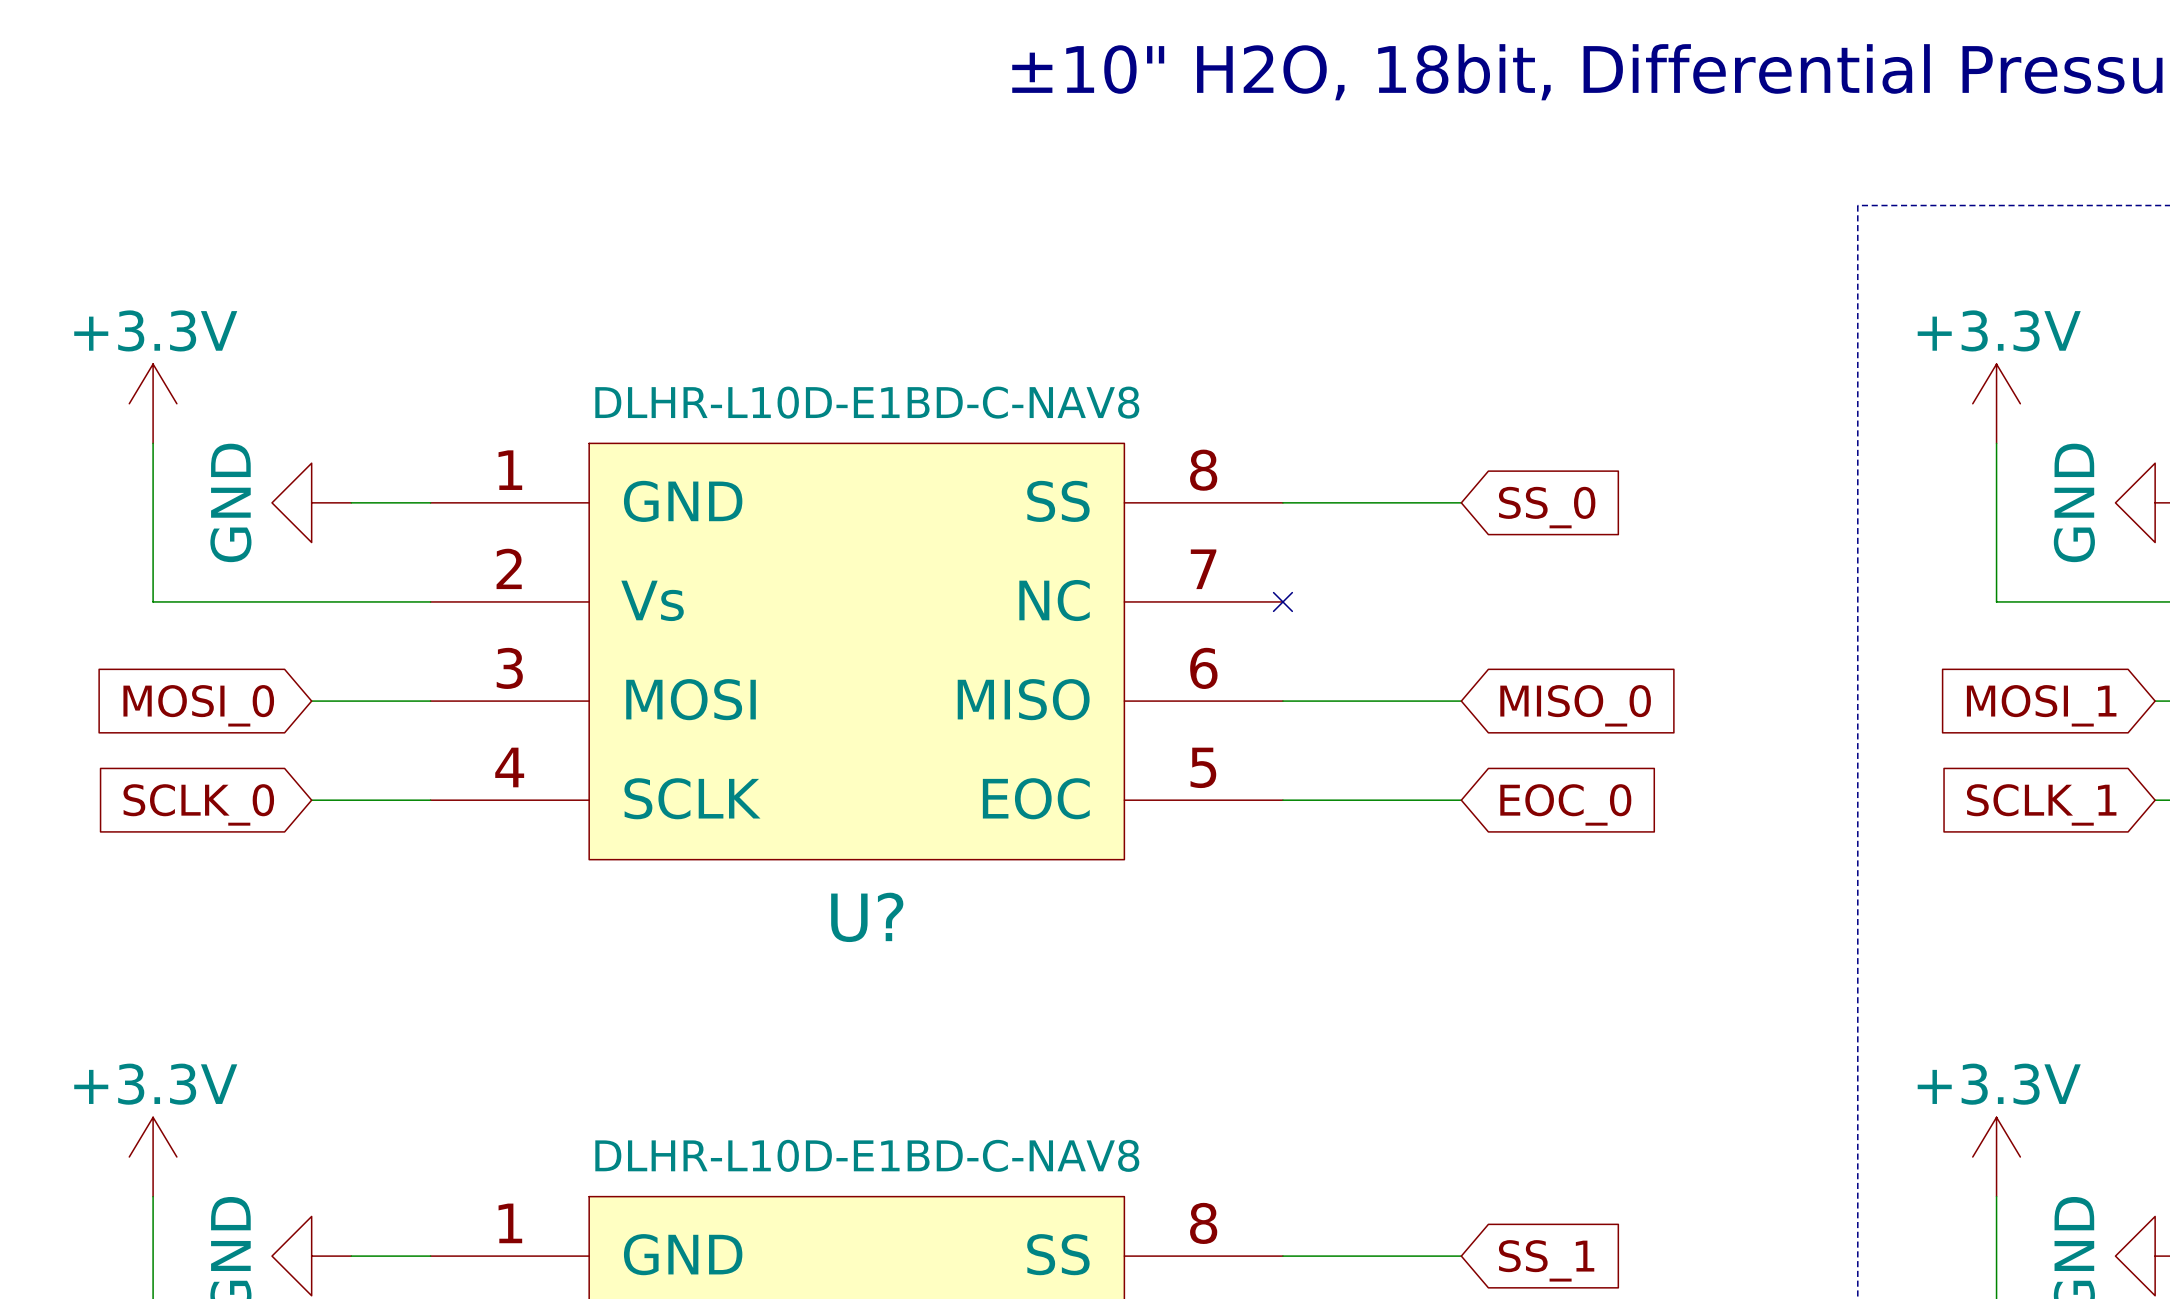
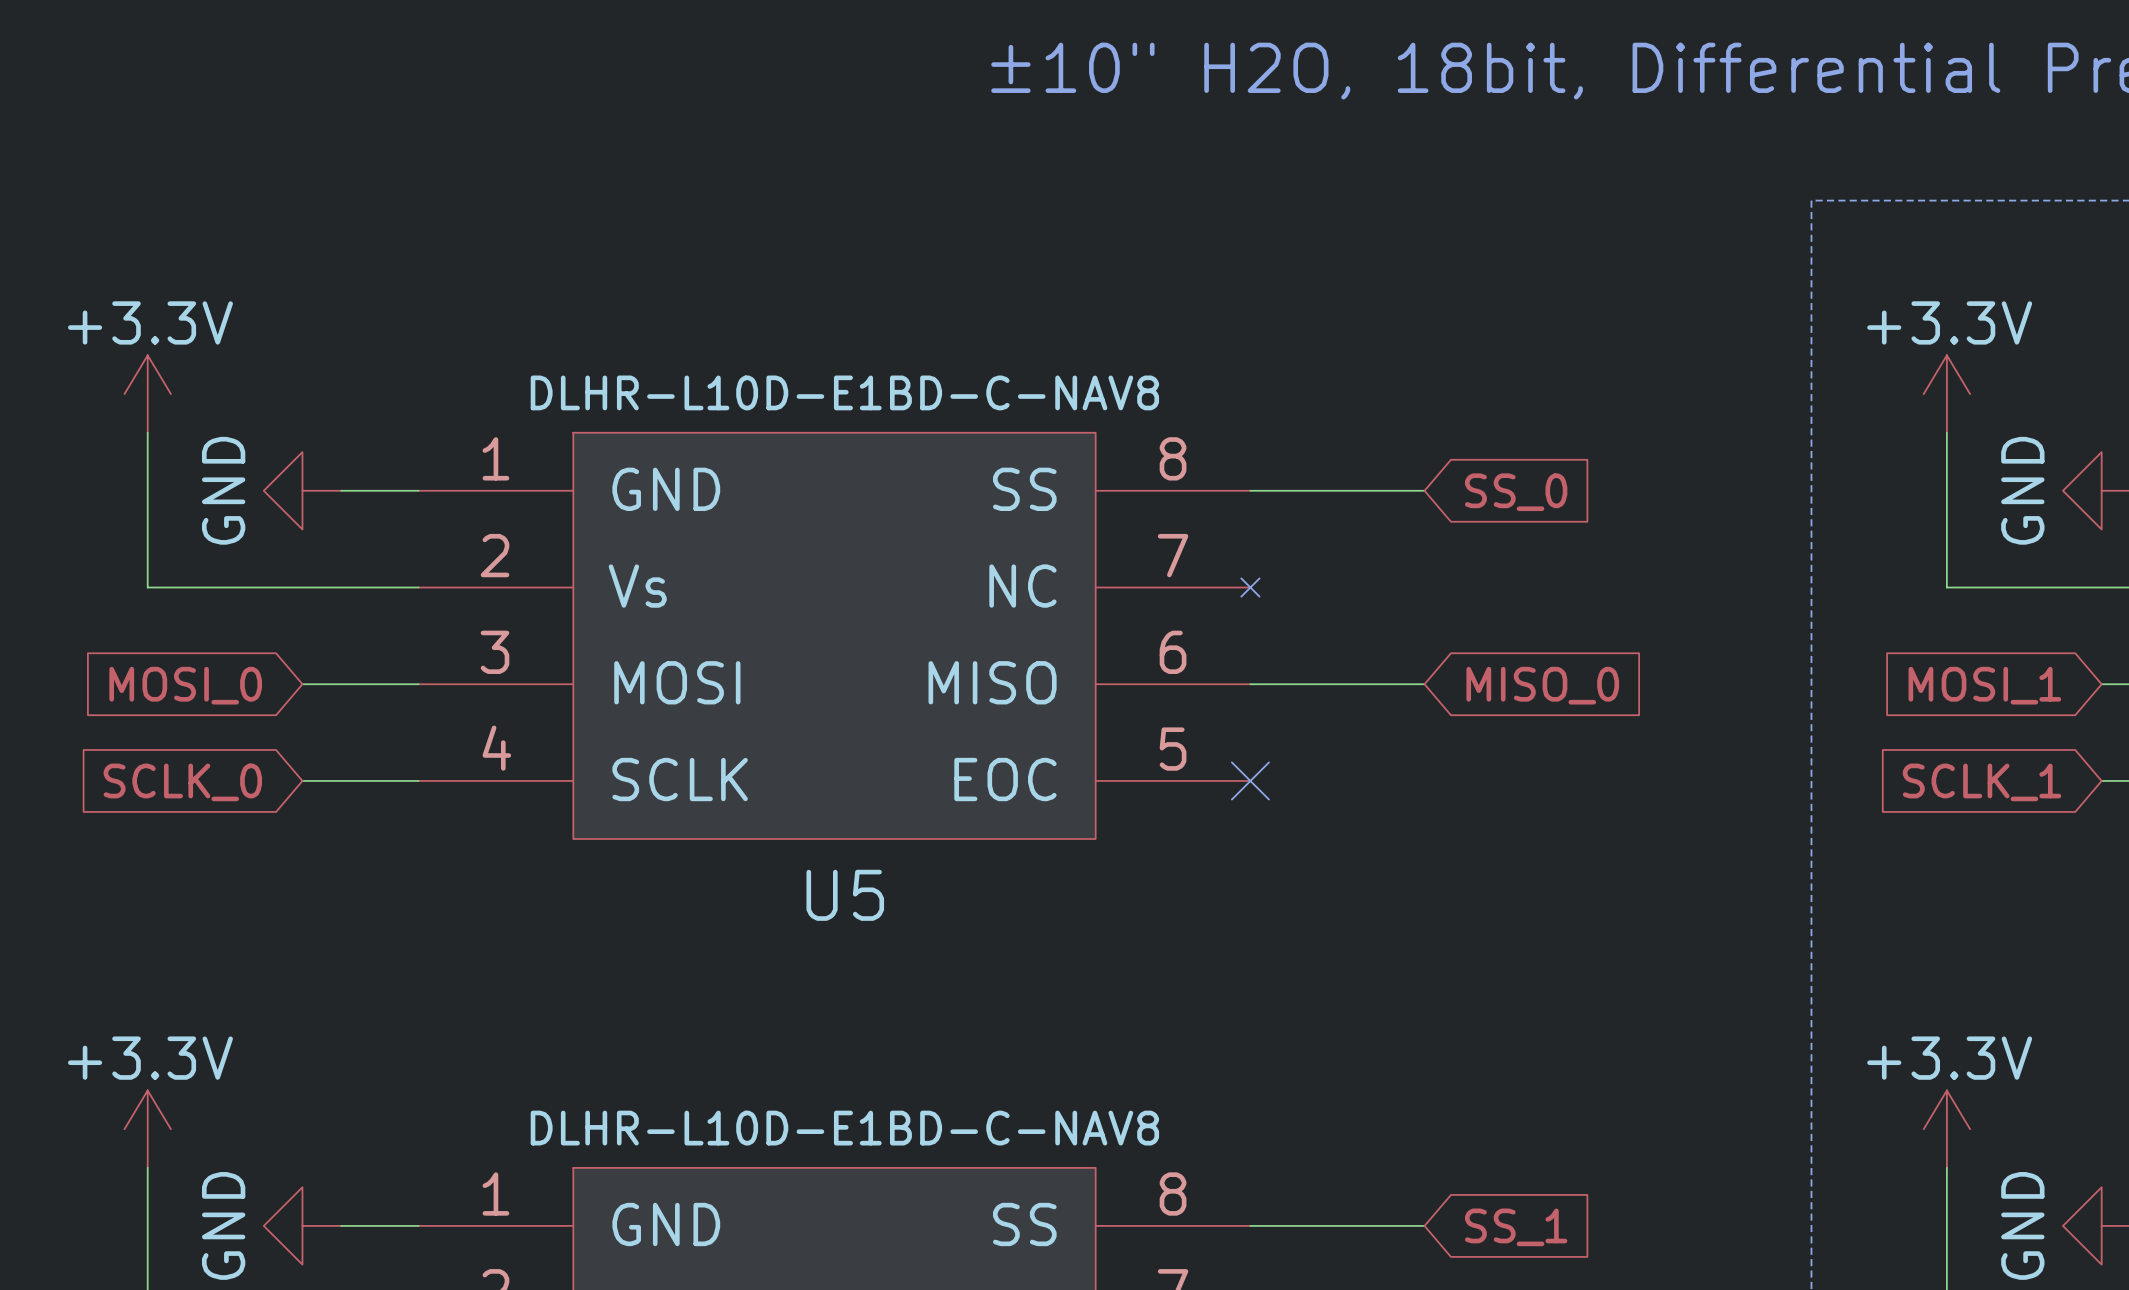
wire: (1282, 800) (1461, 800) -> none
no-connect mark: none -> (1250, 780)
global label: EOC_0 (1565, 804) -> none
U? name: U? (867, 917) -> U5 (845, 895)

